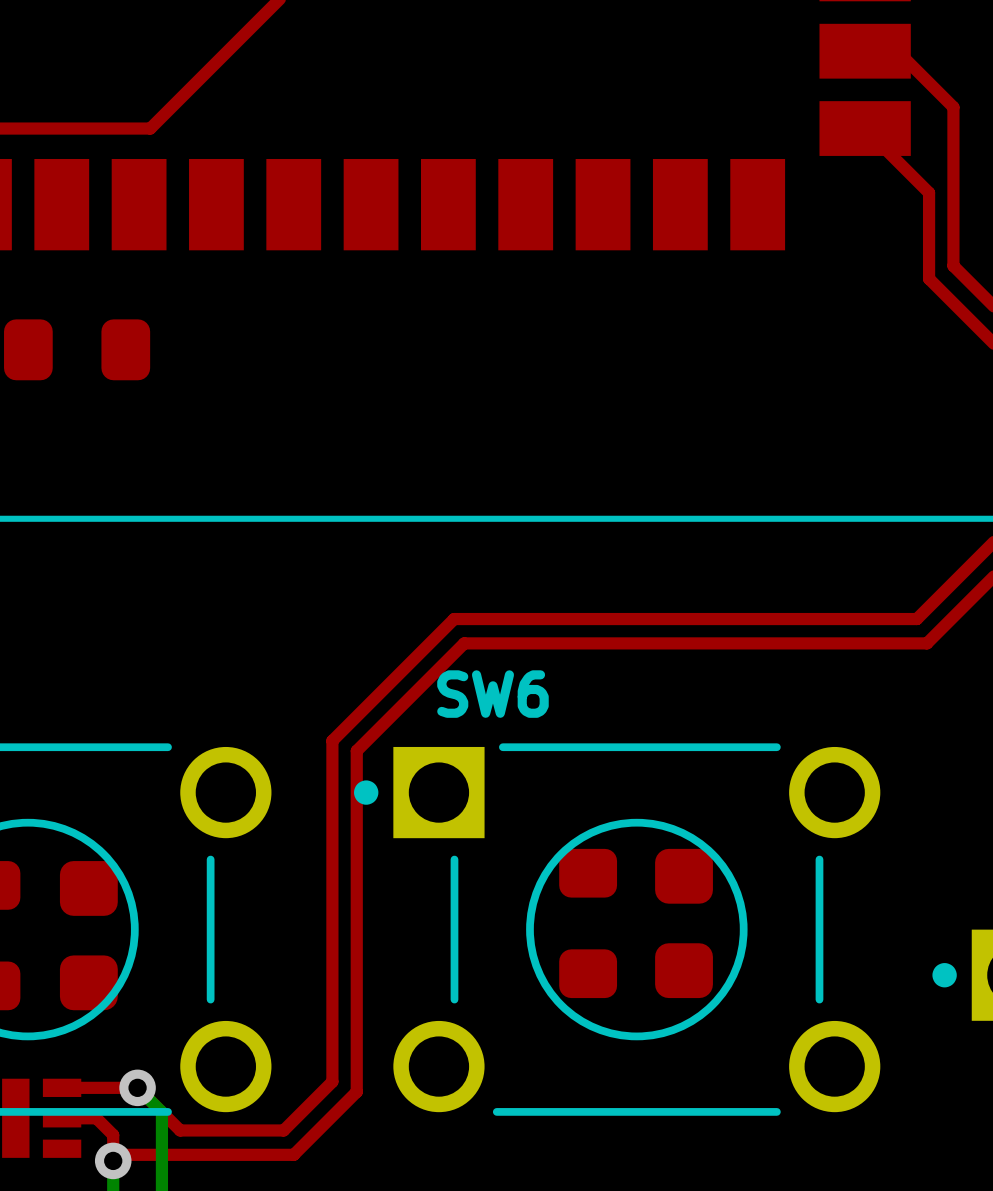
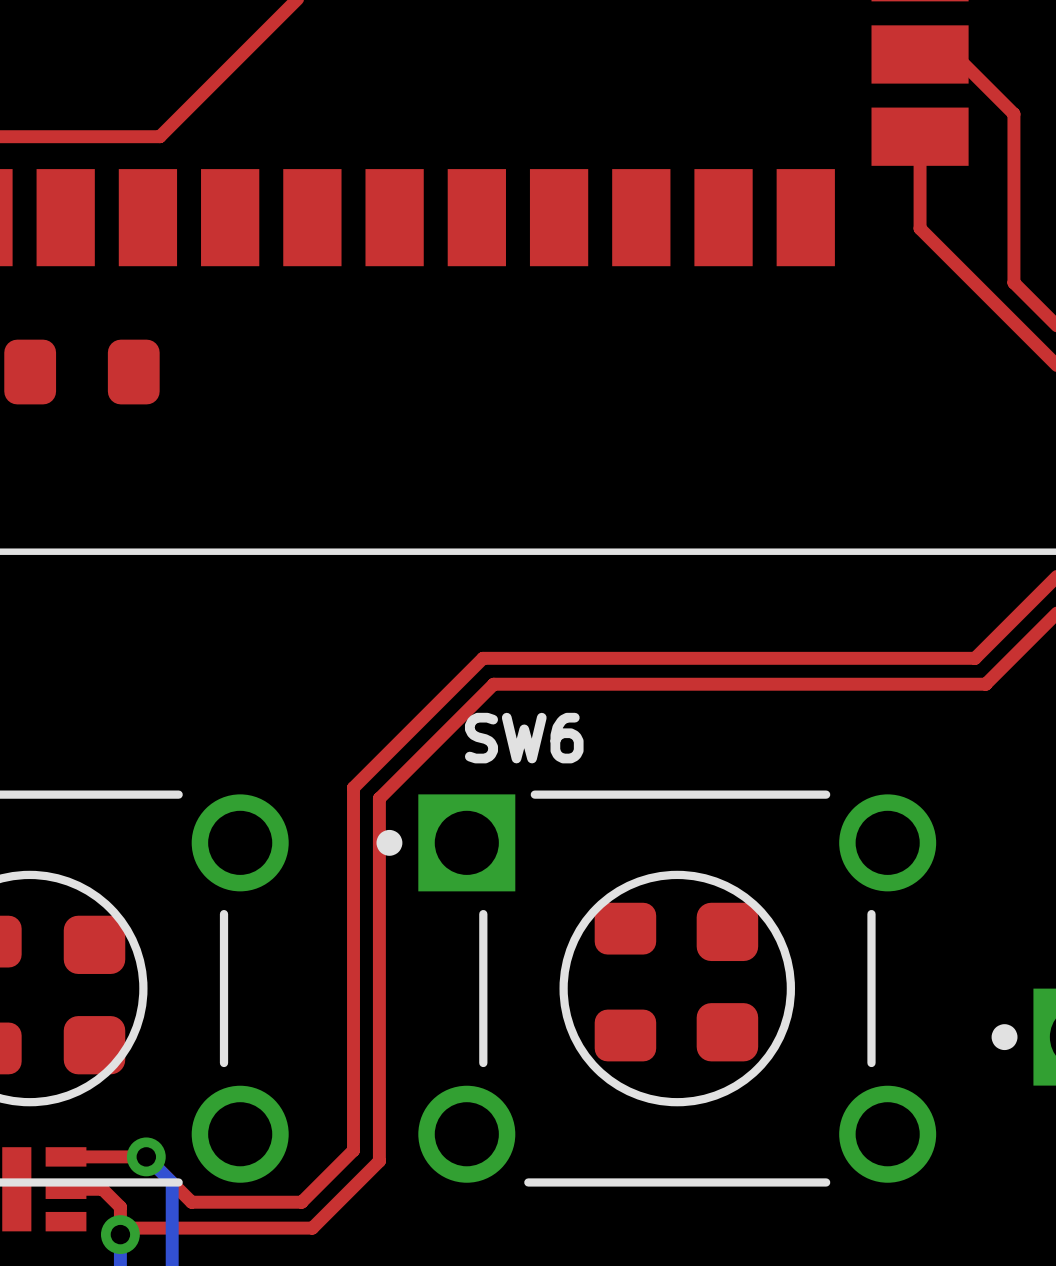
top track: (865, 128) (929, 192) (929, 278) -> (920, 137) (920, 228) (988, 296)

